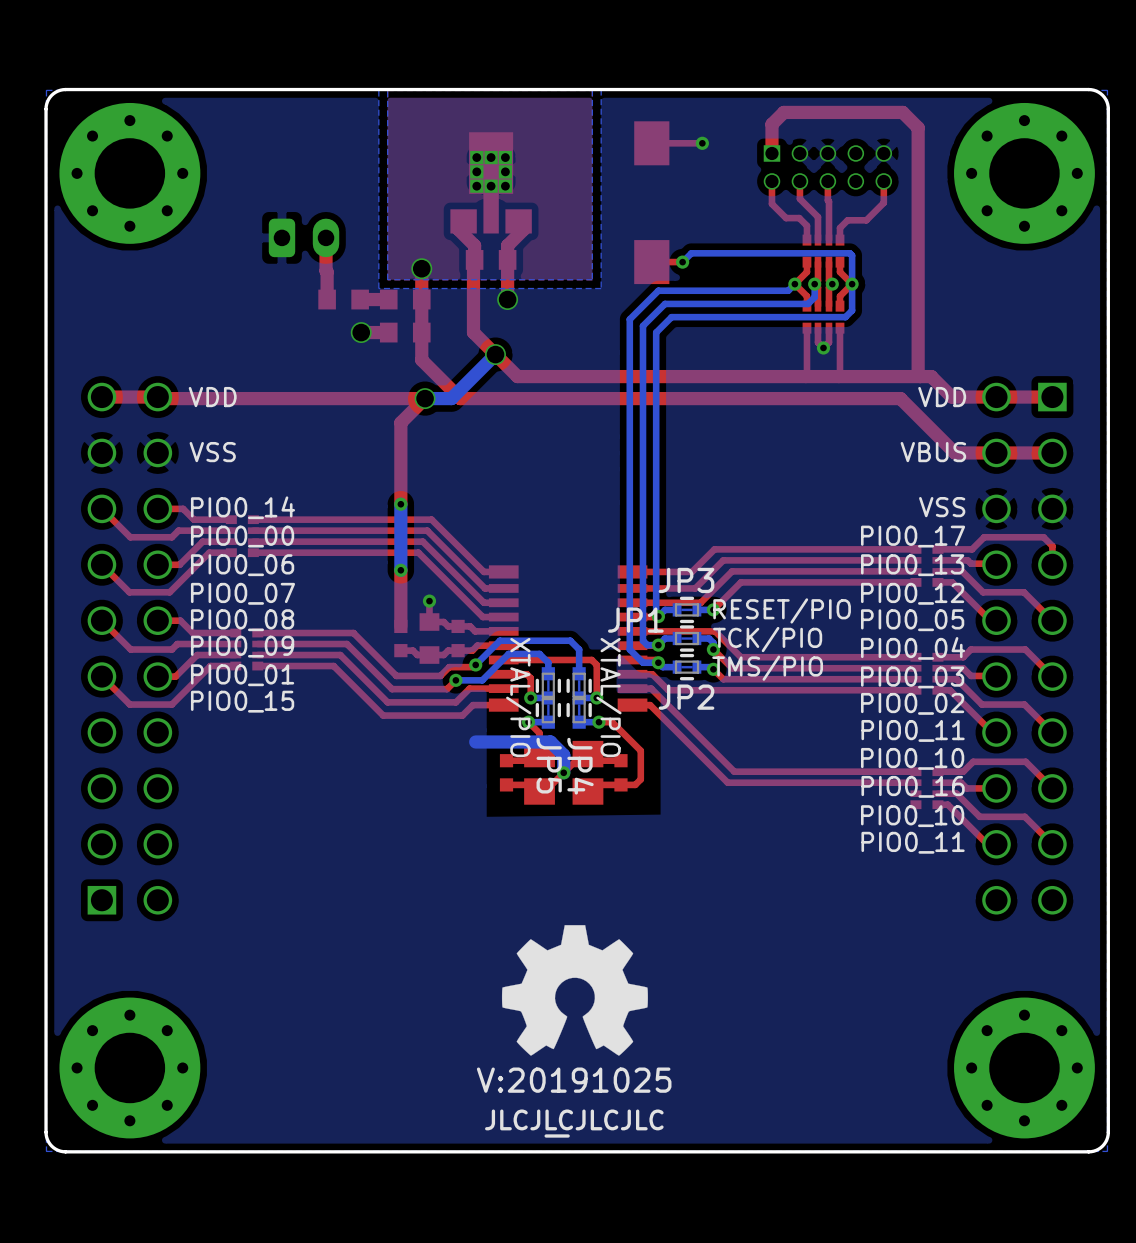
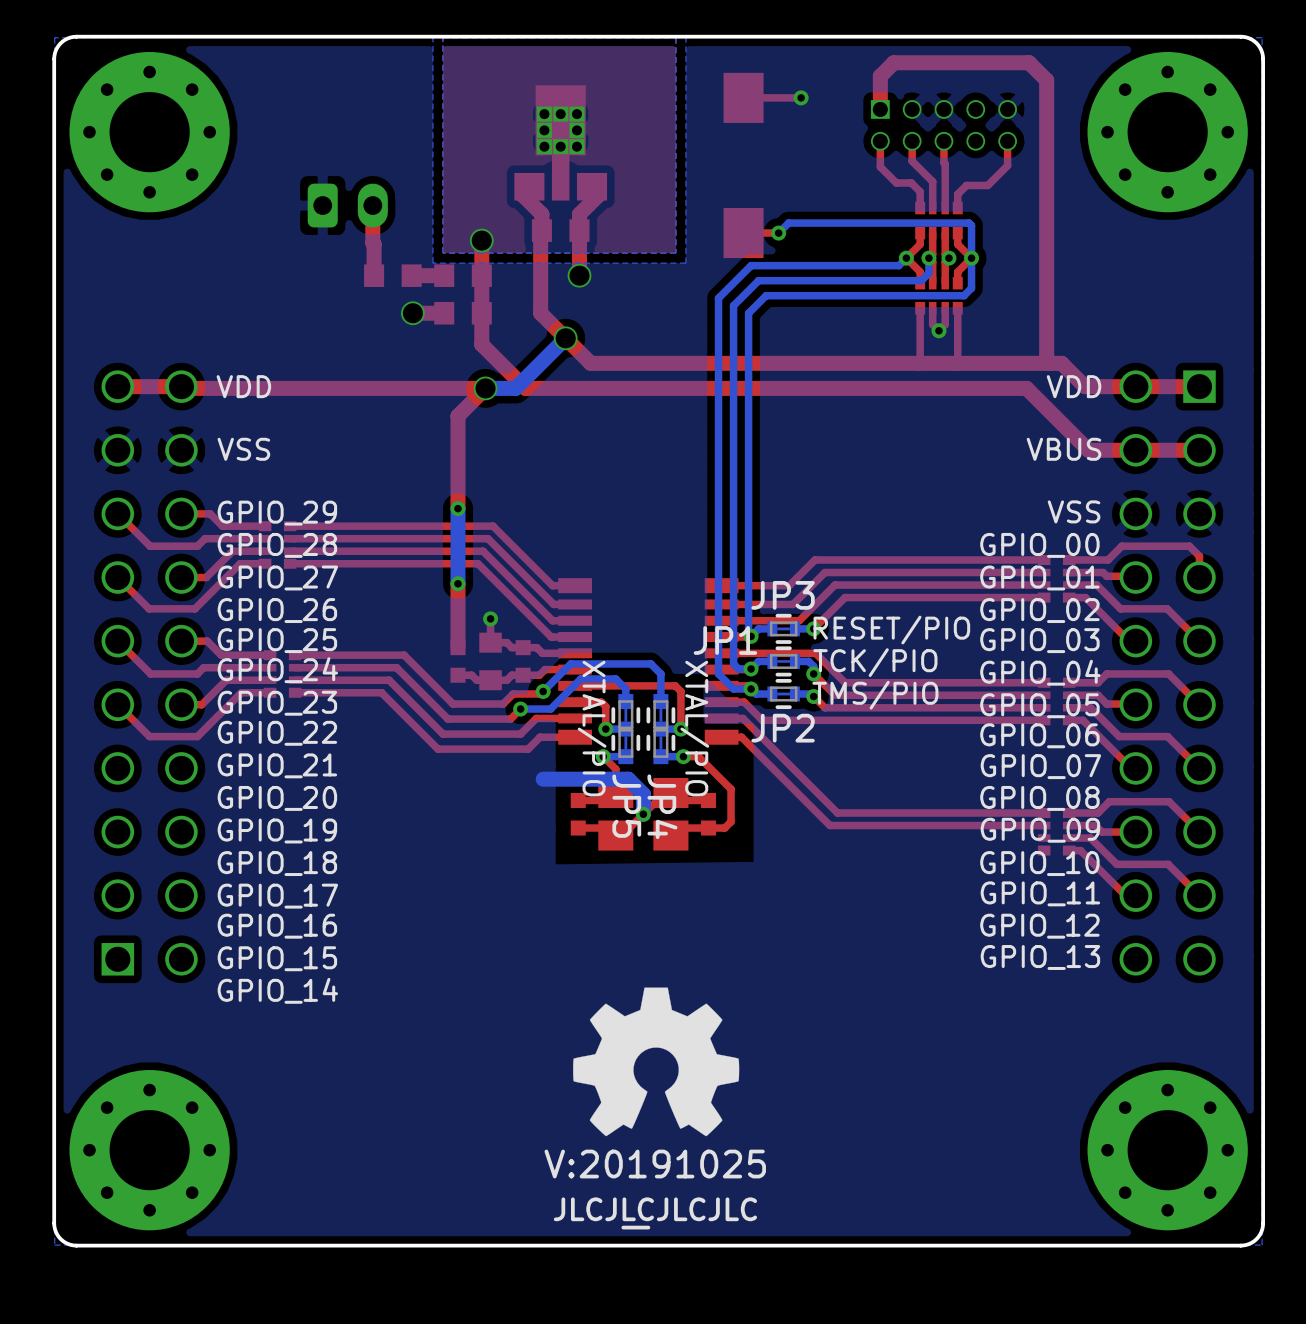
part footprint: [87, 382, 173, 915] -> [101, 370, 198, 976]
part footprint: [982, 382, 1067, 915] -> [1119, 370, 1216, 976]

